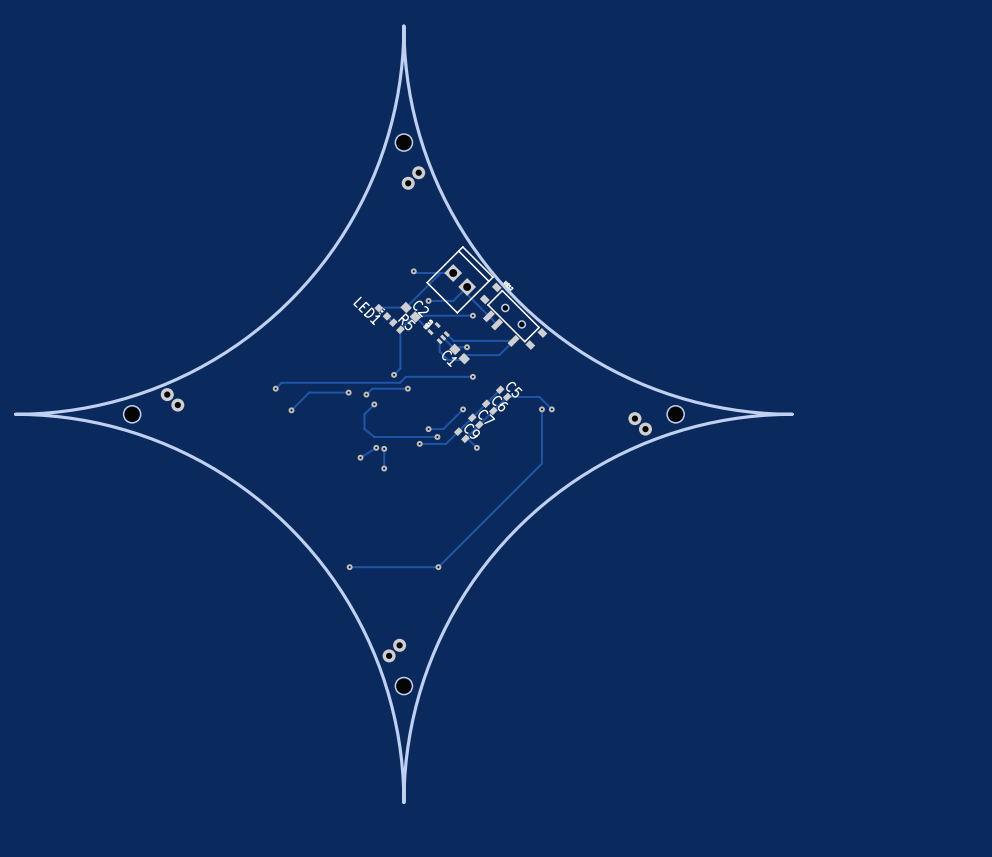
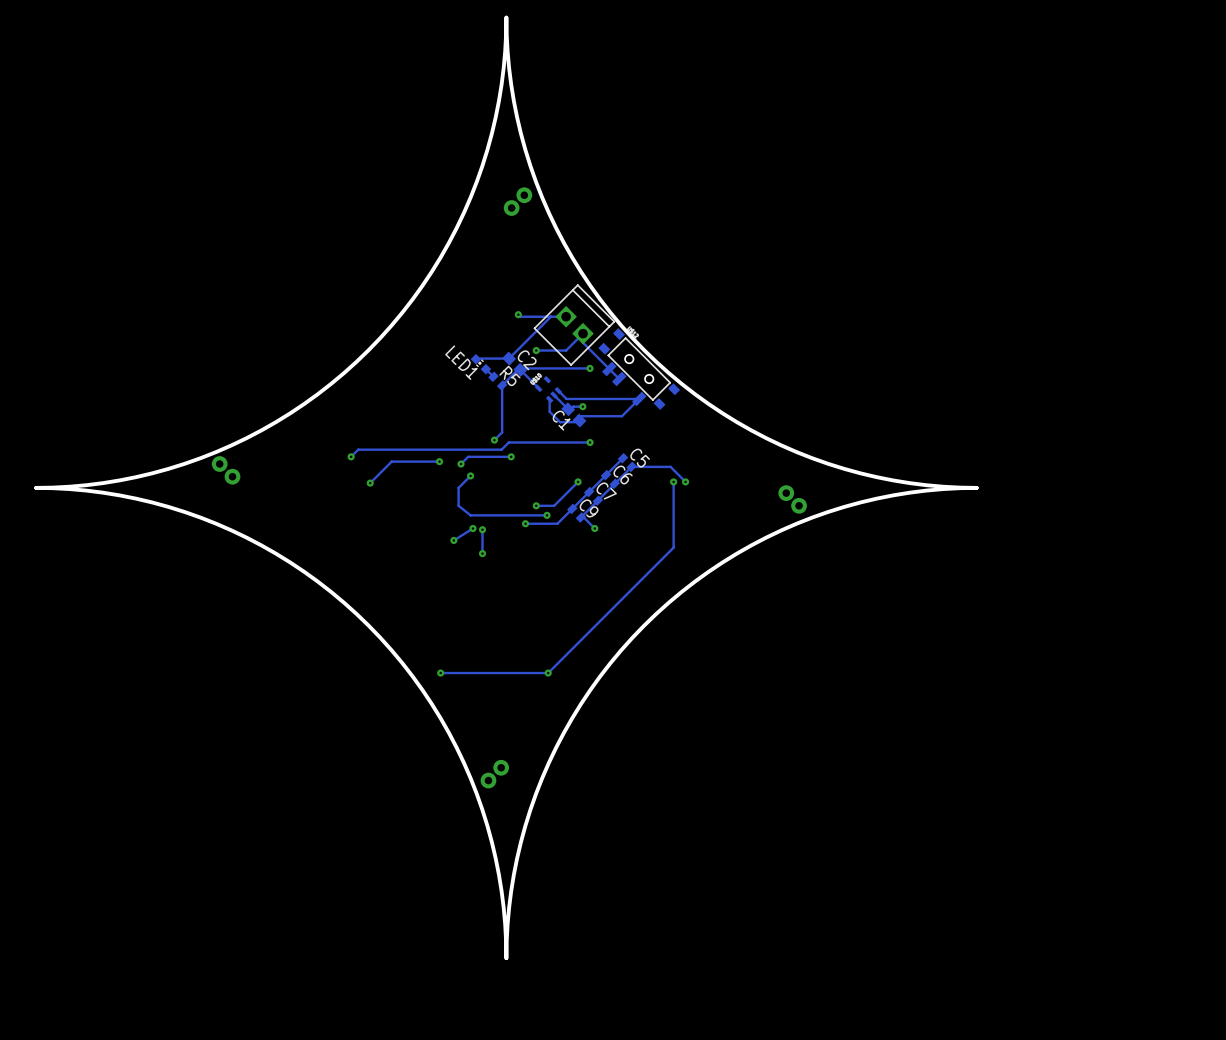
hole: (403, 142) -> none
hole: (132, 414) -> none
hole: (675, 414) -> none
hole: (403, 686) -> none

